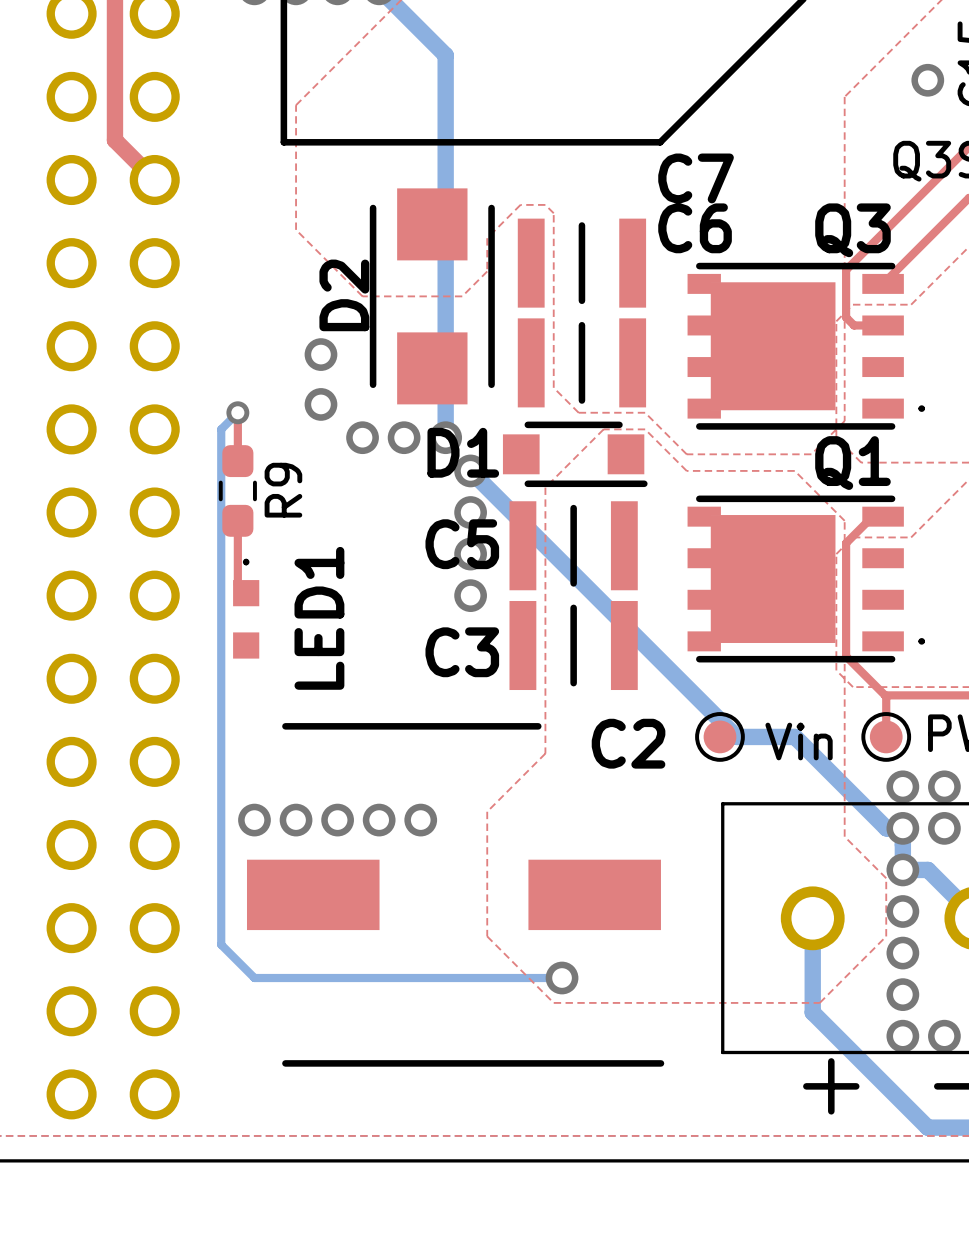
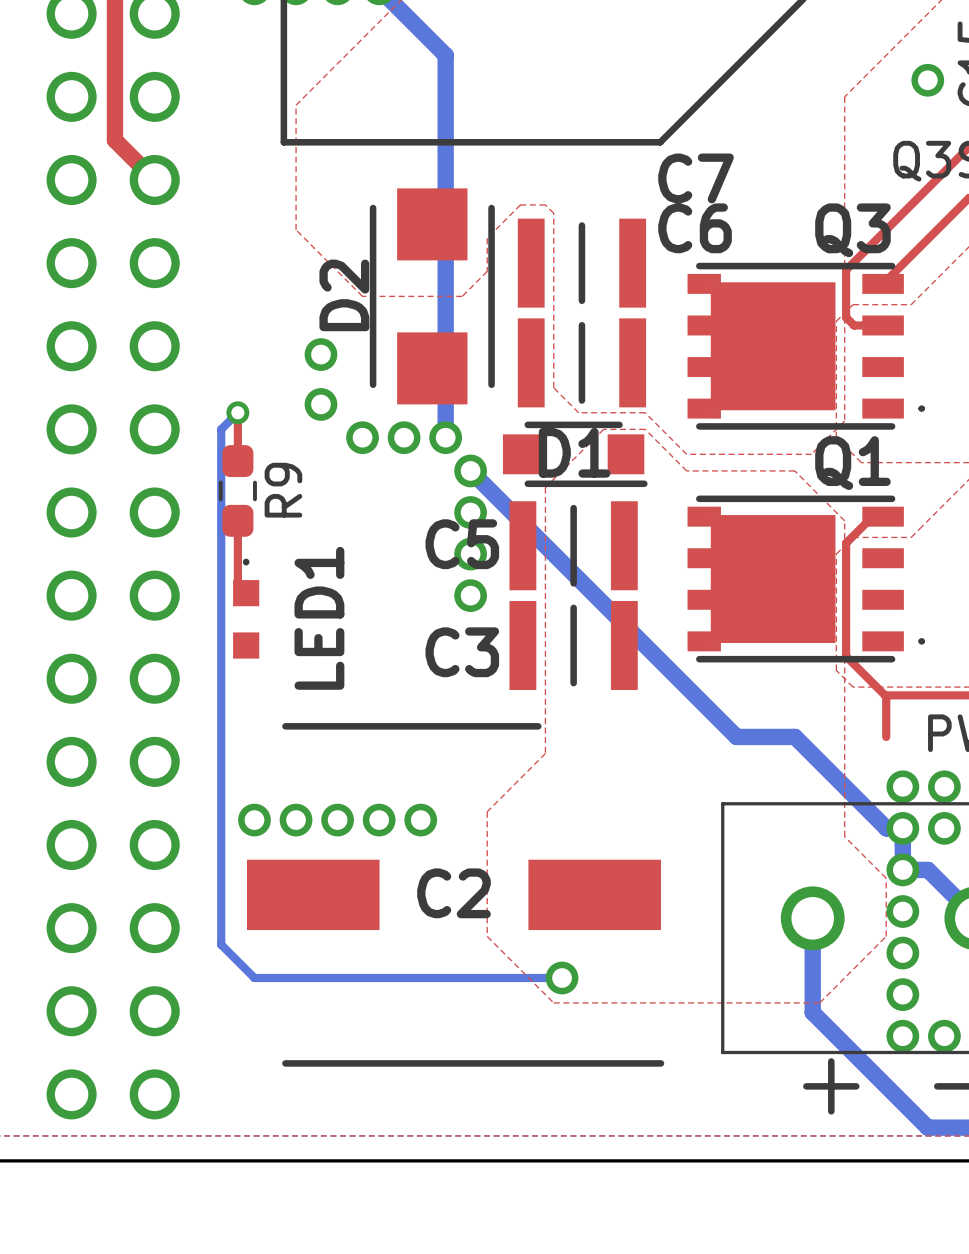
D1 name position: D1 (463, 452) -> D1 (574, 452)
part: (719, 736) -> none
part: (886, 736) -> none
text: Vin (799, 741) -> none
C2 name position: C2 (628, 743) -> C2 (453, 893)

